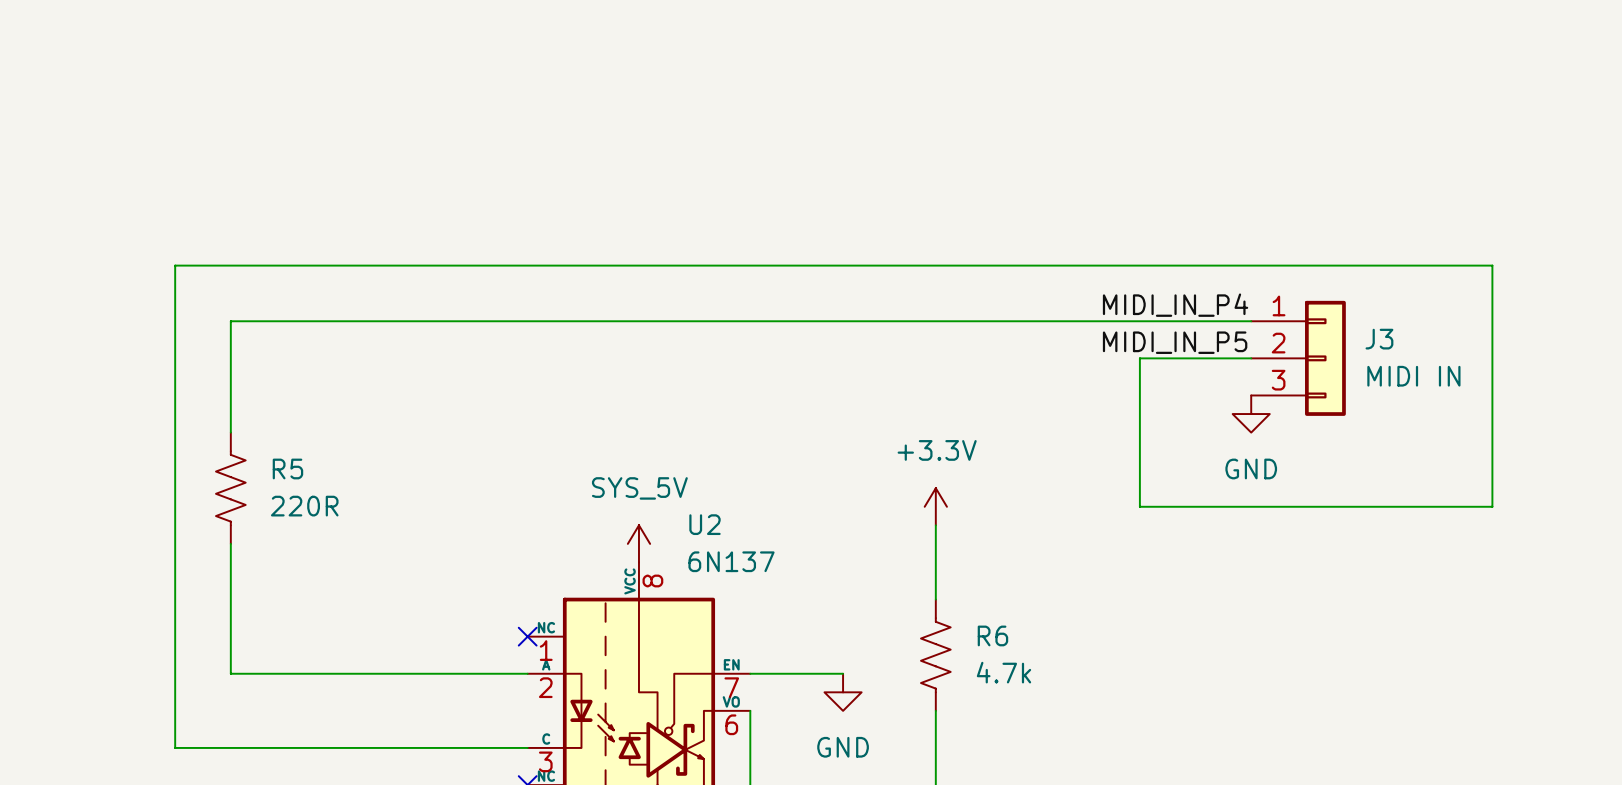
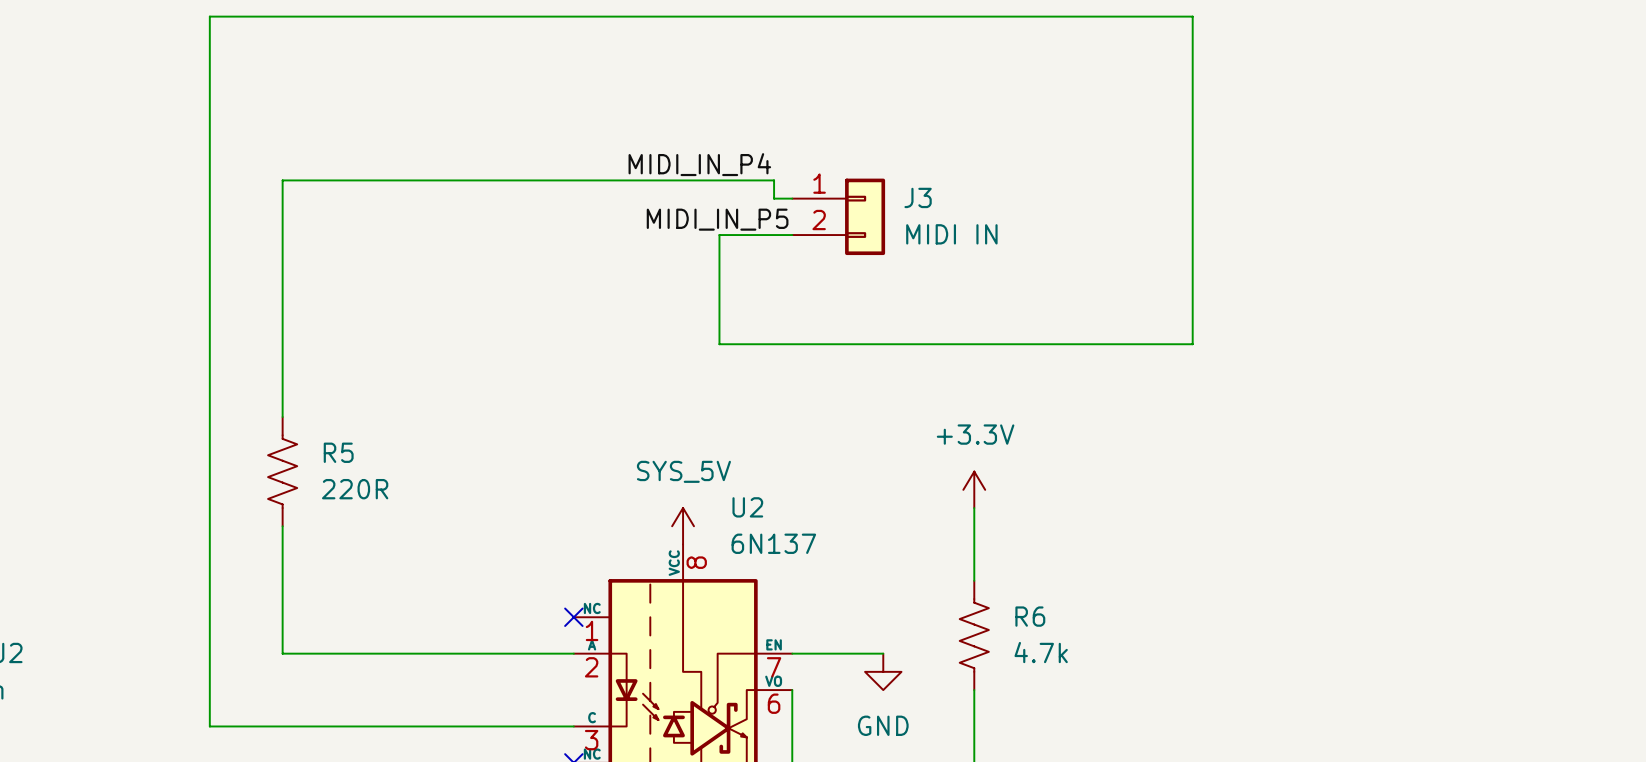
label: none -> MIDI_IN_P4 (699, 164)
label: none -> MIDI_IN_P5 (717, 219)
wire: none -> (792, 235) (719, 235) (719, 344) (1174, 344)
J3 symbol: [1251, 300, 1346, 416] -> [792, 178, 886, 256]
label: MIDI_IN_P4 (1175, 305) -> none
wire: (230, 321) (1251, 321) -> (282, 307) (282, 180) (774, 180) (774, 198) (792, 198)
label: MIDI_IN_P5 (1175, 342) -> none
wire: (1139, 358) (1139, 506) (1492, 506) (1492, 265) (175, 265) (175, 747) -> (1192, 344) (1192, 16) (209, 16) (209, 726) (228, 726)
wire: (1158, 358) (1251, 358) -> none
power symbol: GND (1251, 414) -> none

